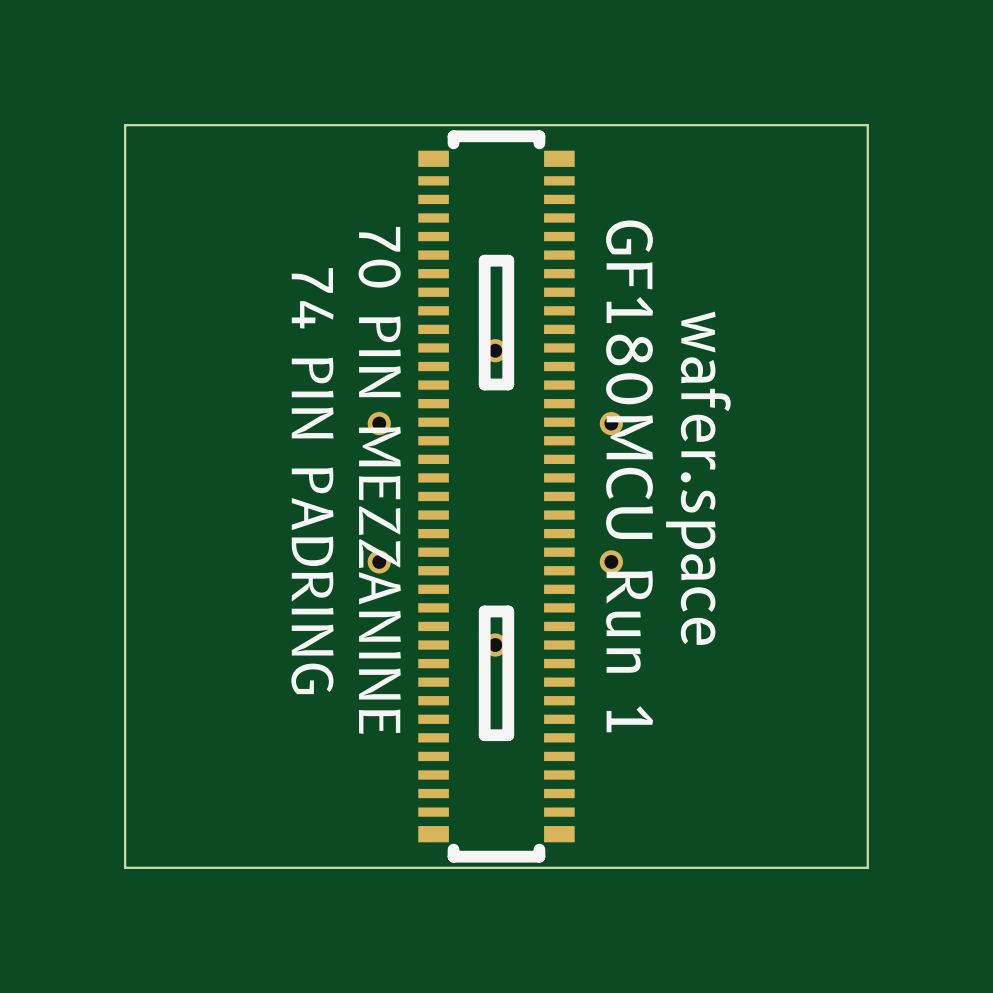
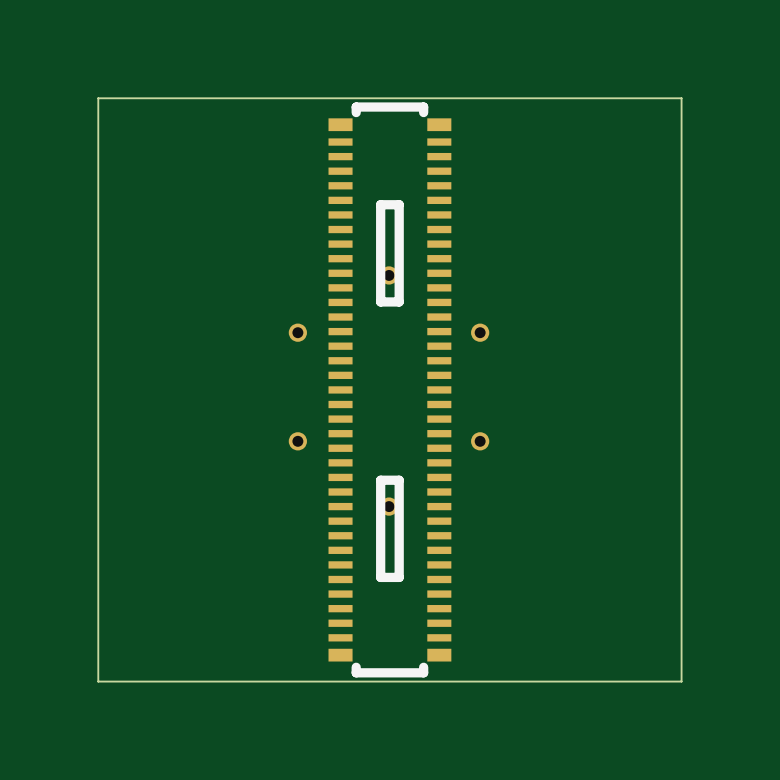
text: GF180MCU Run 1 (629, 476) -> none
text: wafer.space (698, 478) -> none
text: 70 PIN MEZZANINE (379, 480) -> none
text: 74 PIN PADRING (312, 481) -> none

